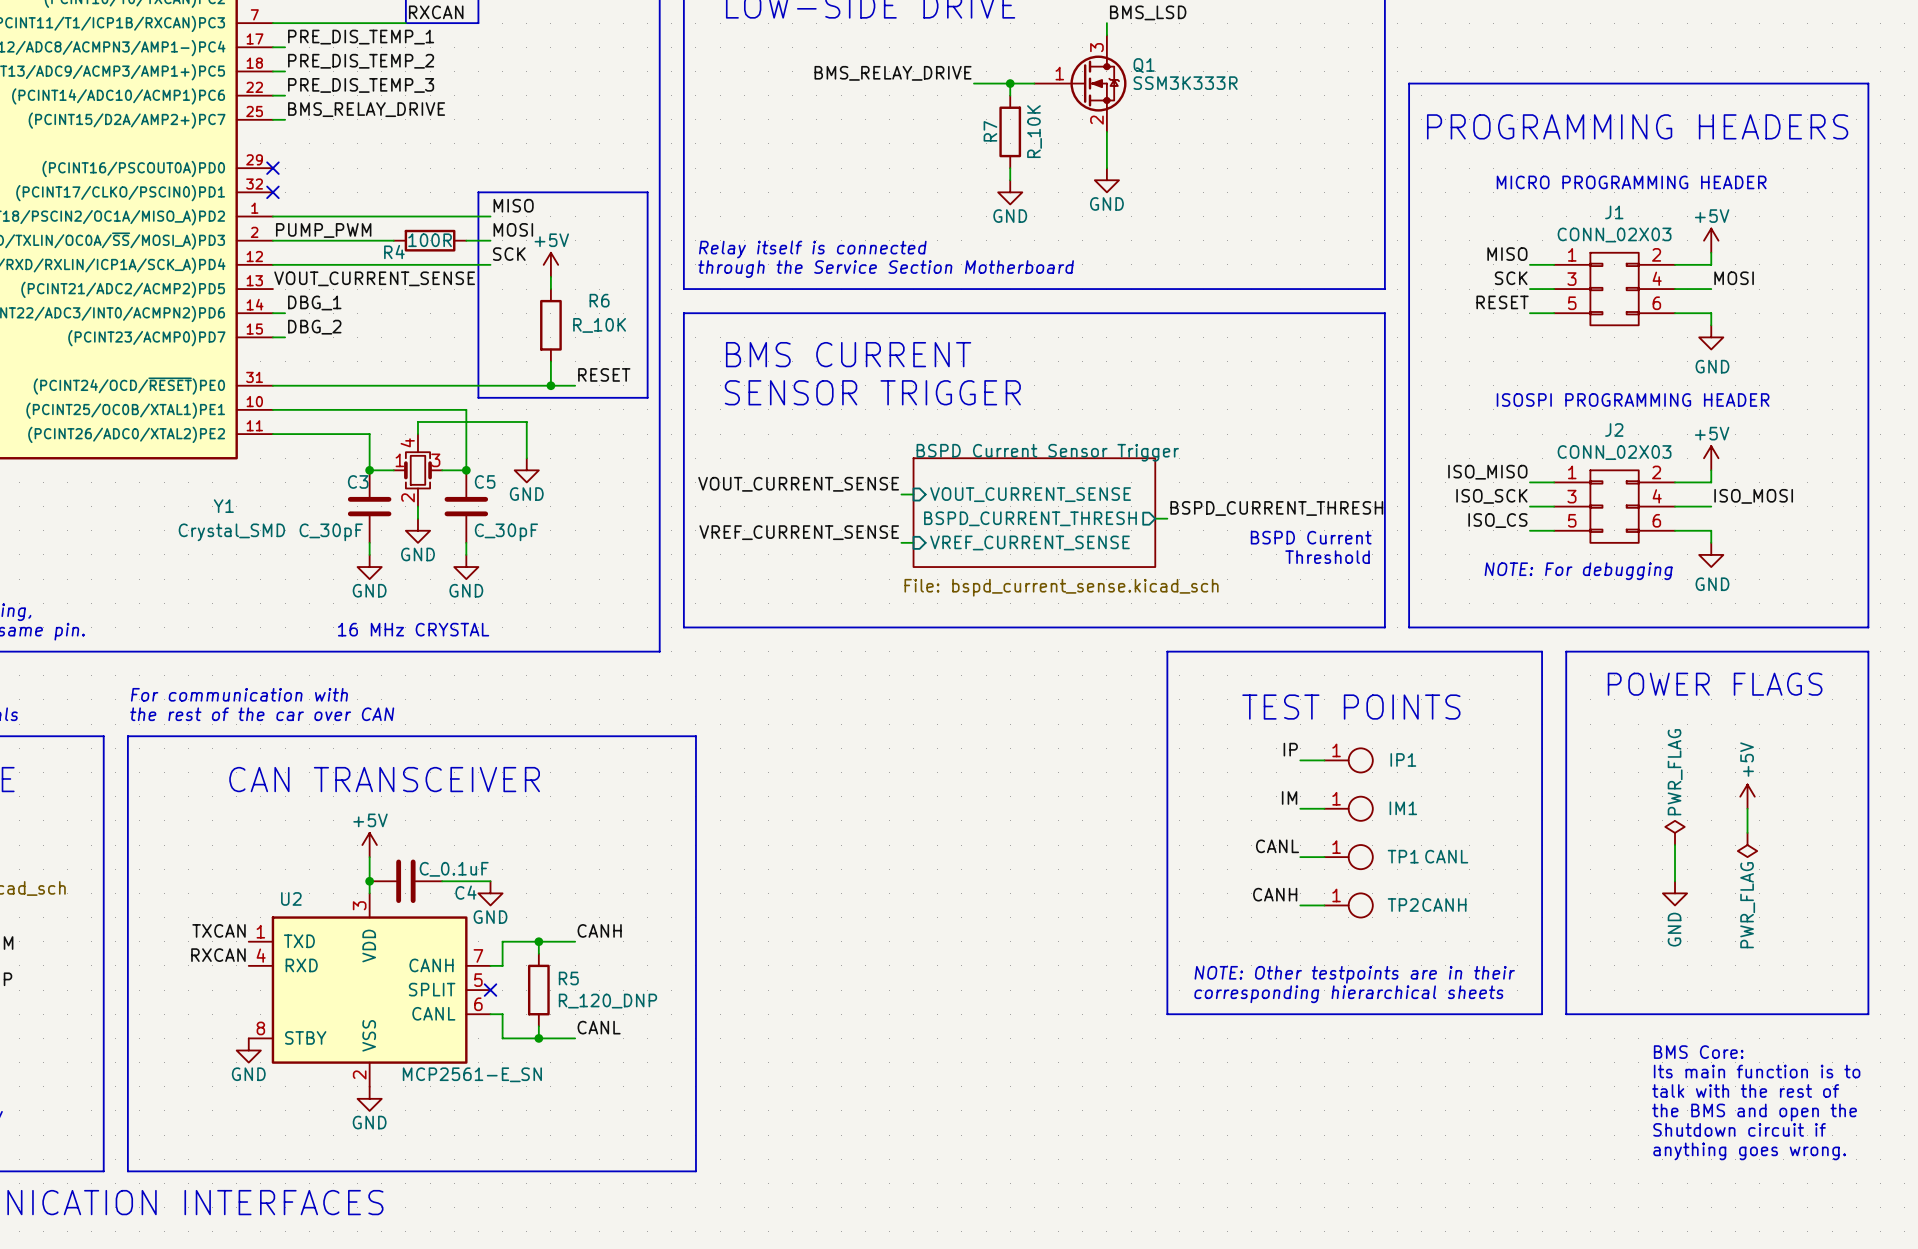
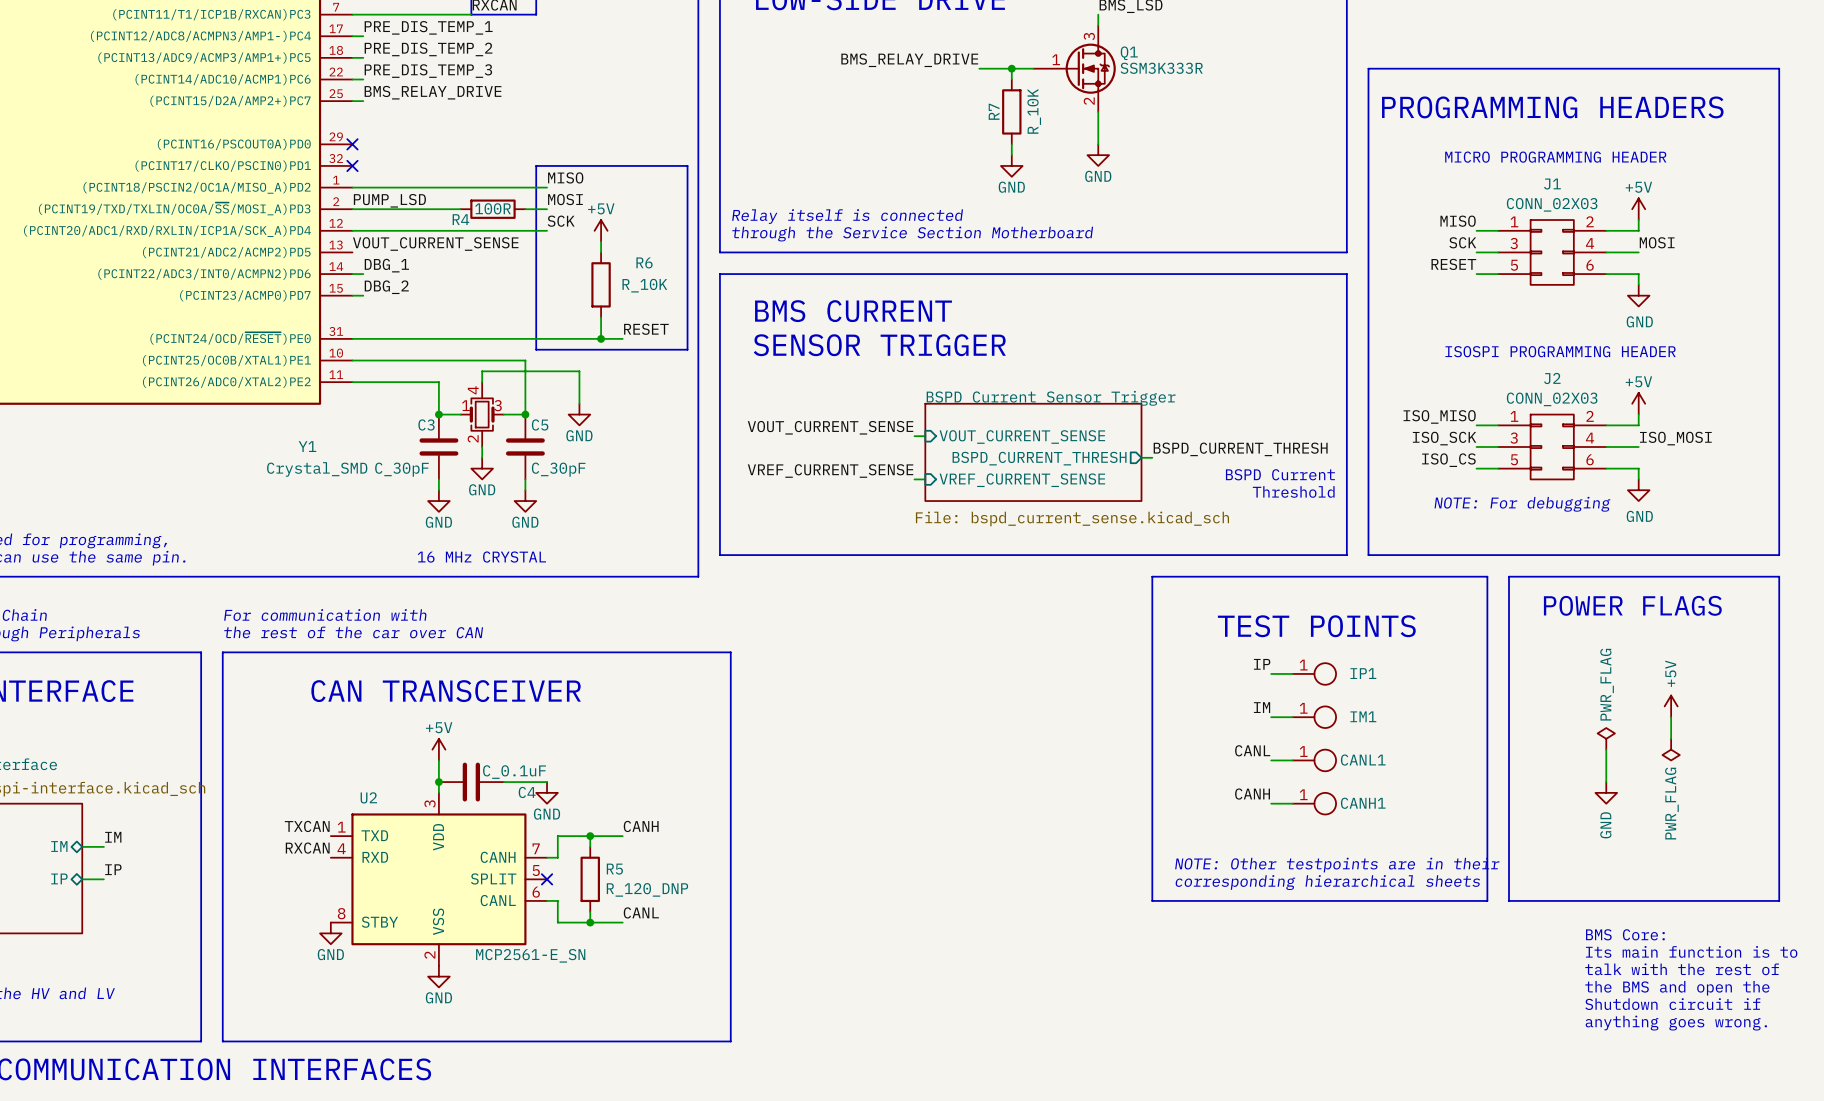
label: PUMP_PWM (323, 230) -> PUMP_LSD (389, 200)
TP1 name: TP1 (1403, 856) -> CANL1 (1363, 760)
TP1 value: CANL (1446, 856) -> none
TP2 name: TP2 (1403, 905) -> CANH1 (1363, 803)
TP2 value: CANH (1444, 905) -> none

